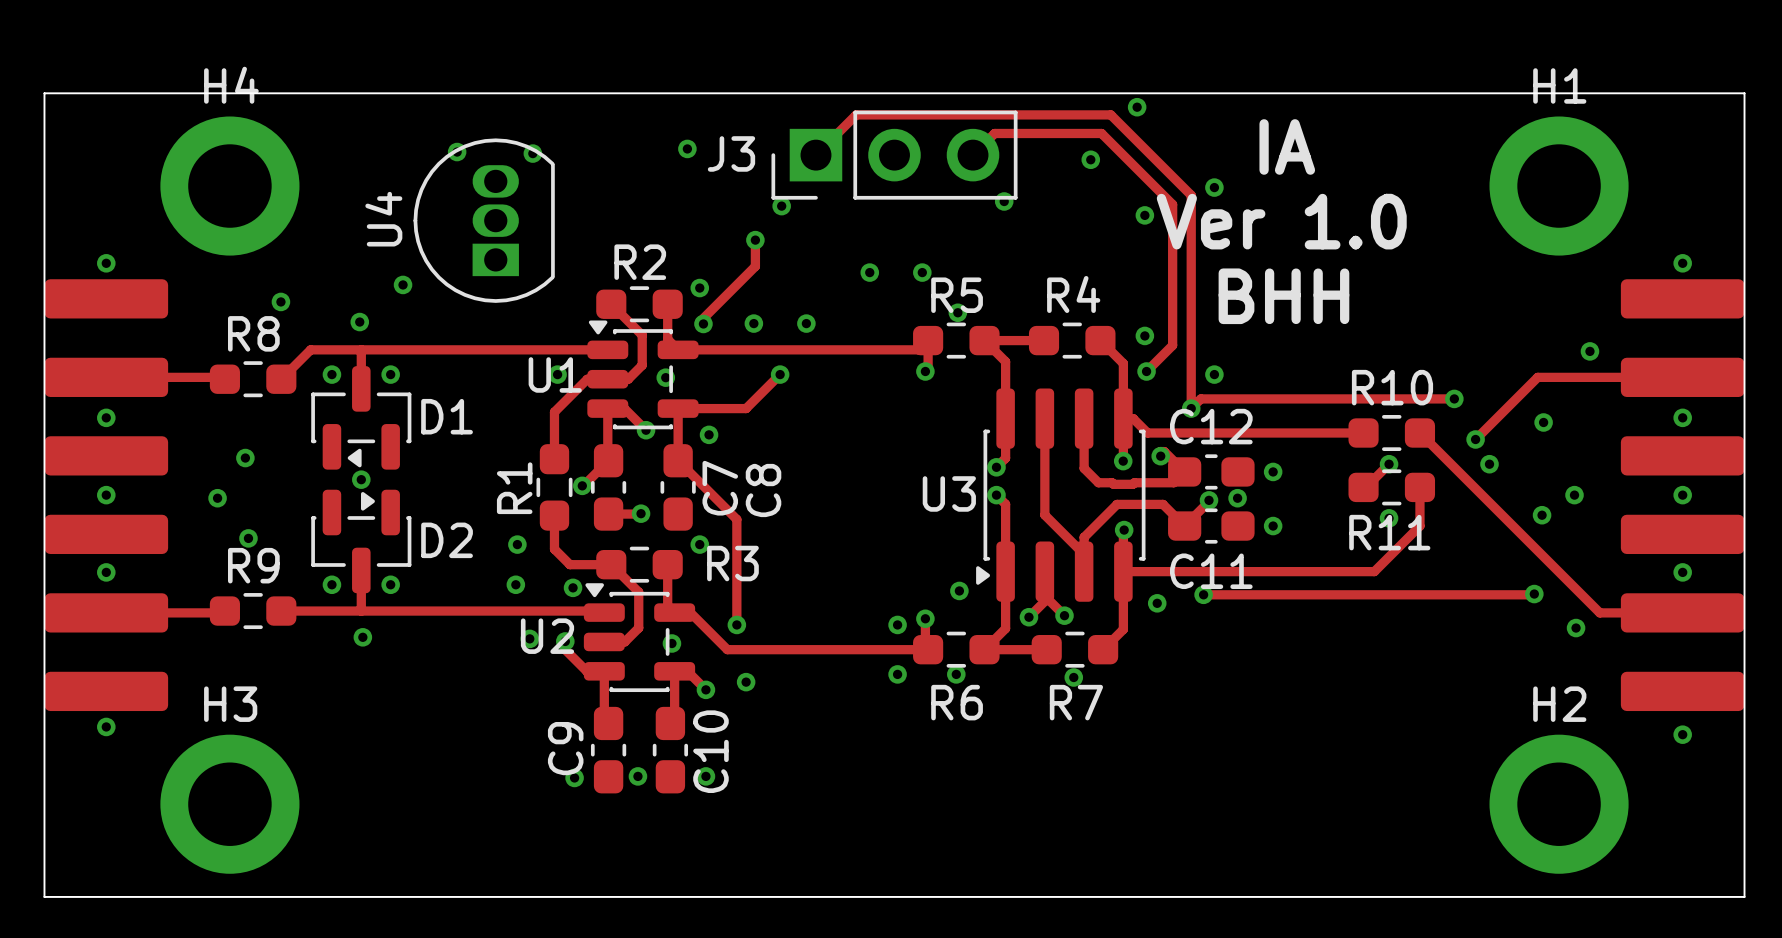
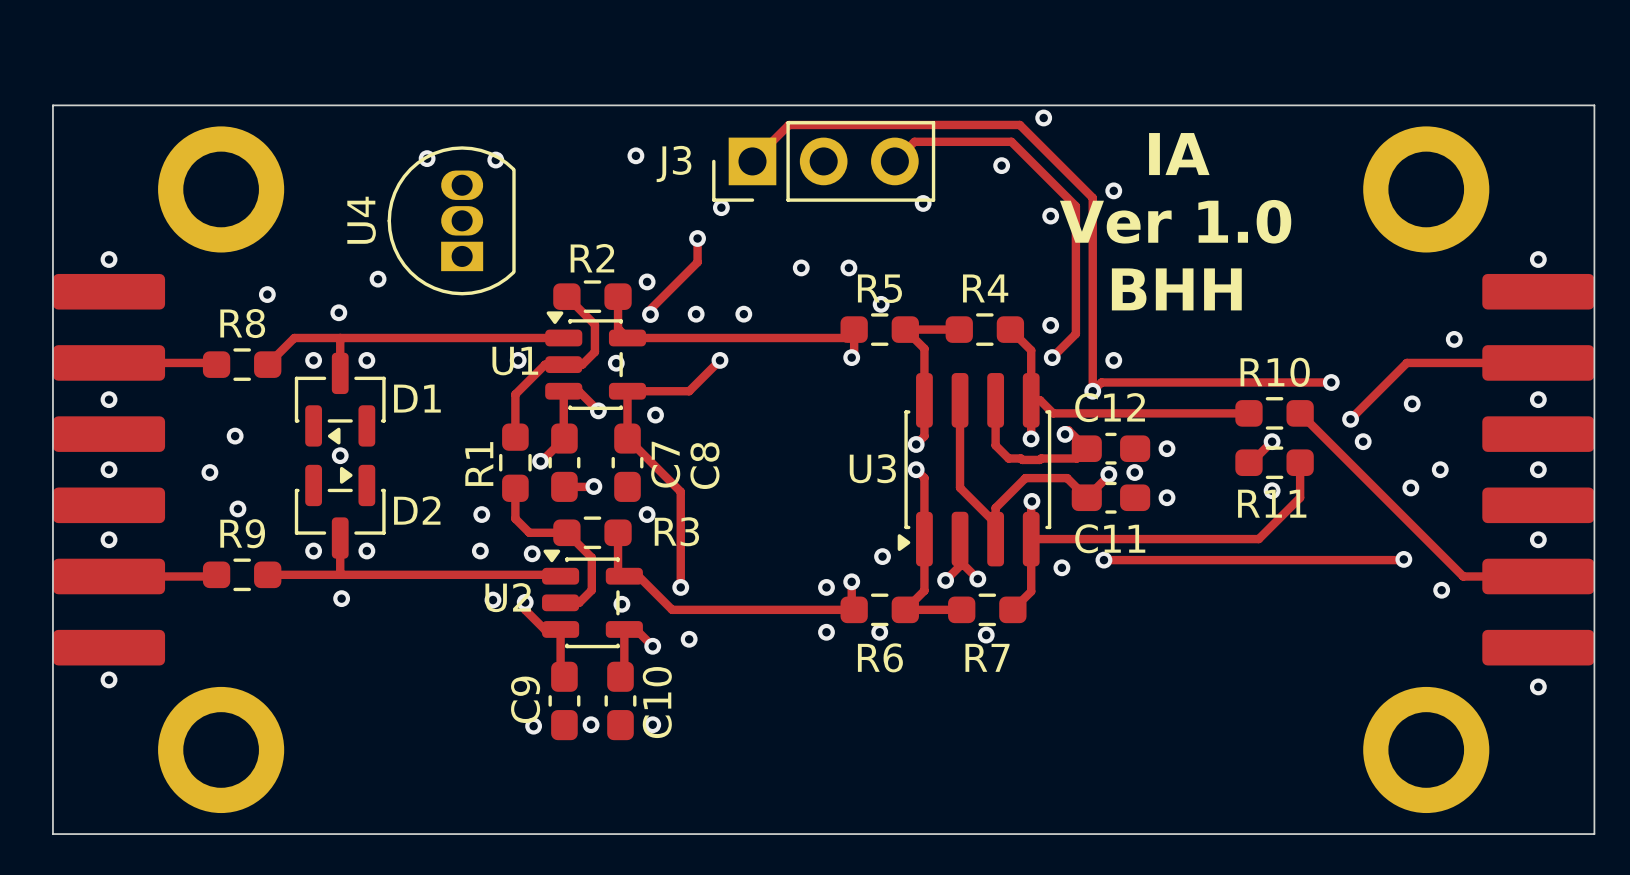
H4 name: H4 (231, 85) -> none
H1 name: H1 (1559, 85) -> none
H3 name: H3 (230, 704) -> none
H2 name: H2 (1559, 704) -> none

